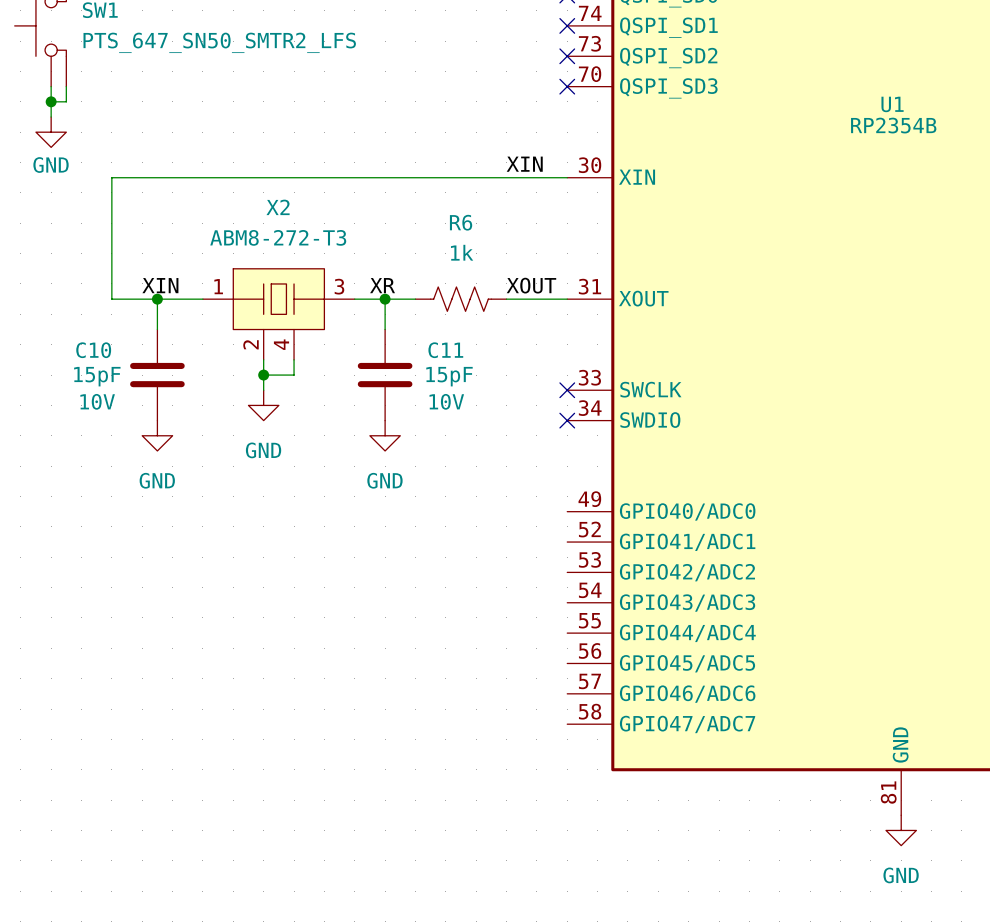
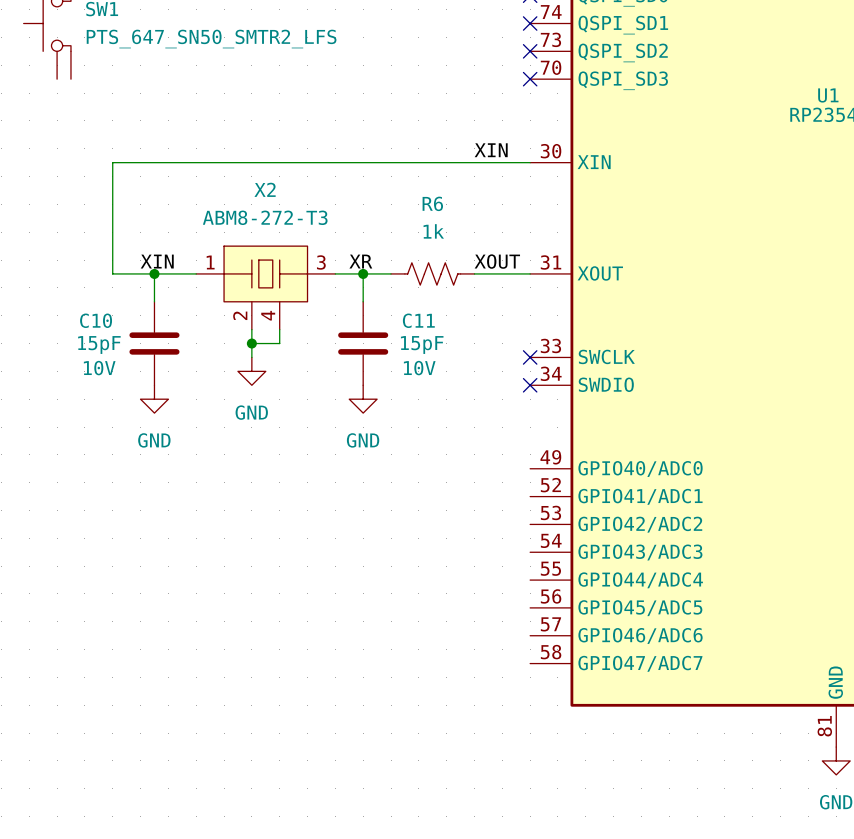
wire: (51, 86) (51, 117) -> none
wire: (66, 86) (66, 101) (51, 101) -> none
junction: (51, 101) -> none
power symbol: GND (51, 132) -> none

